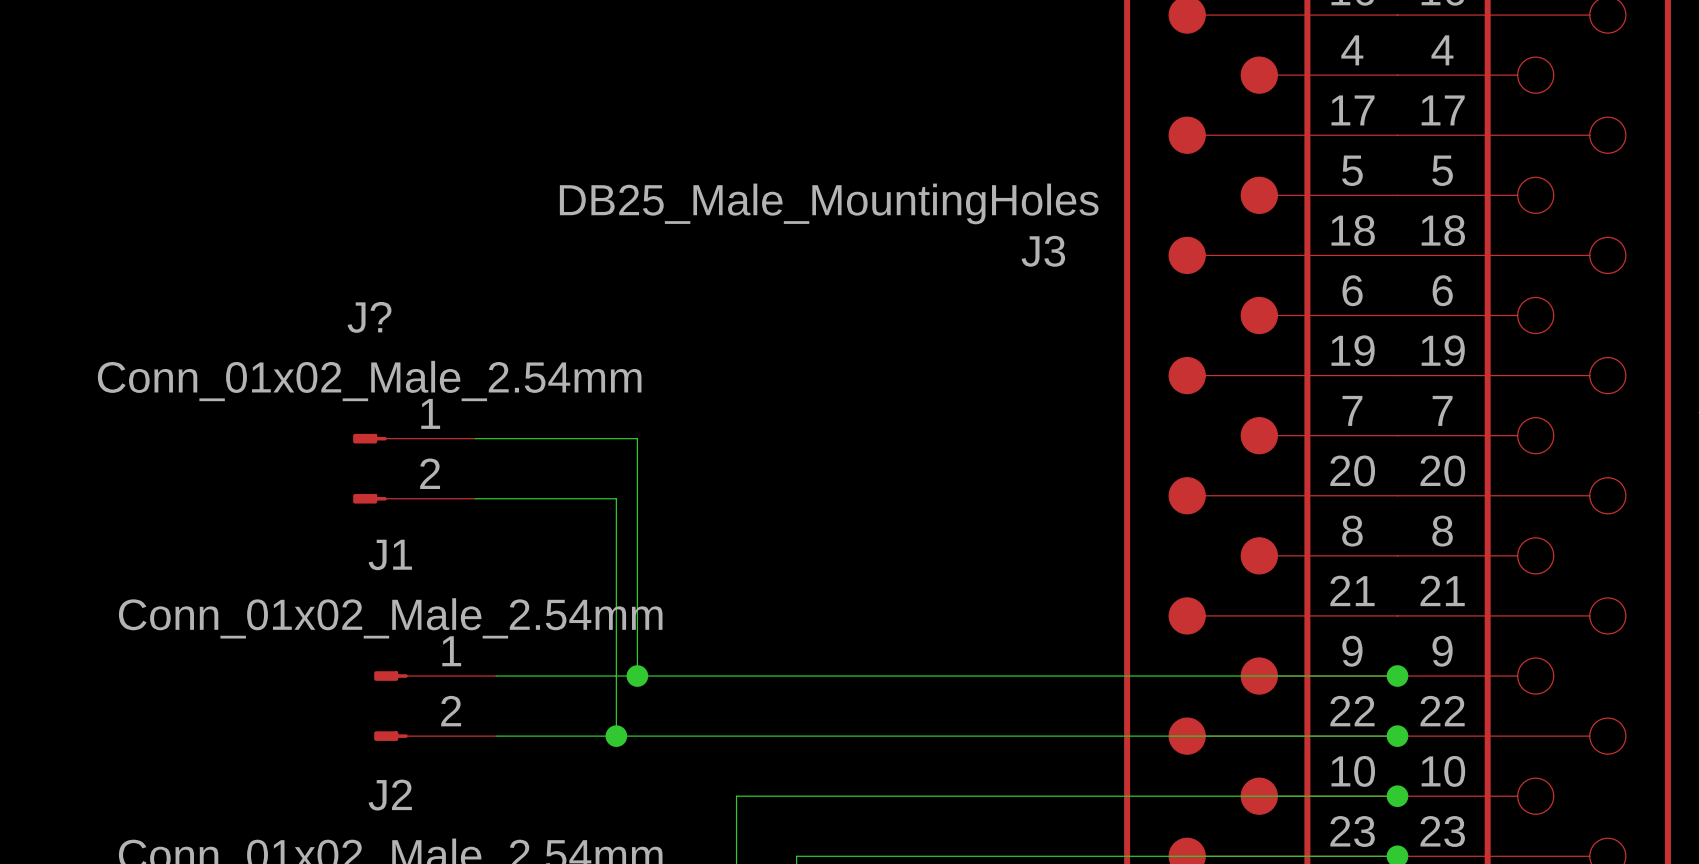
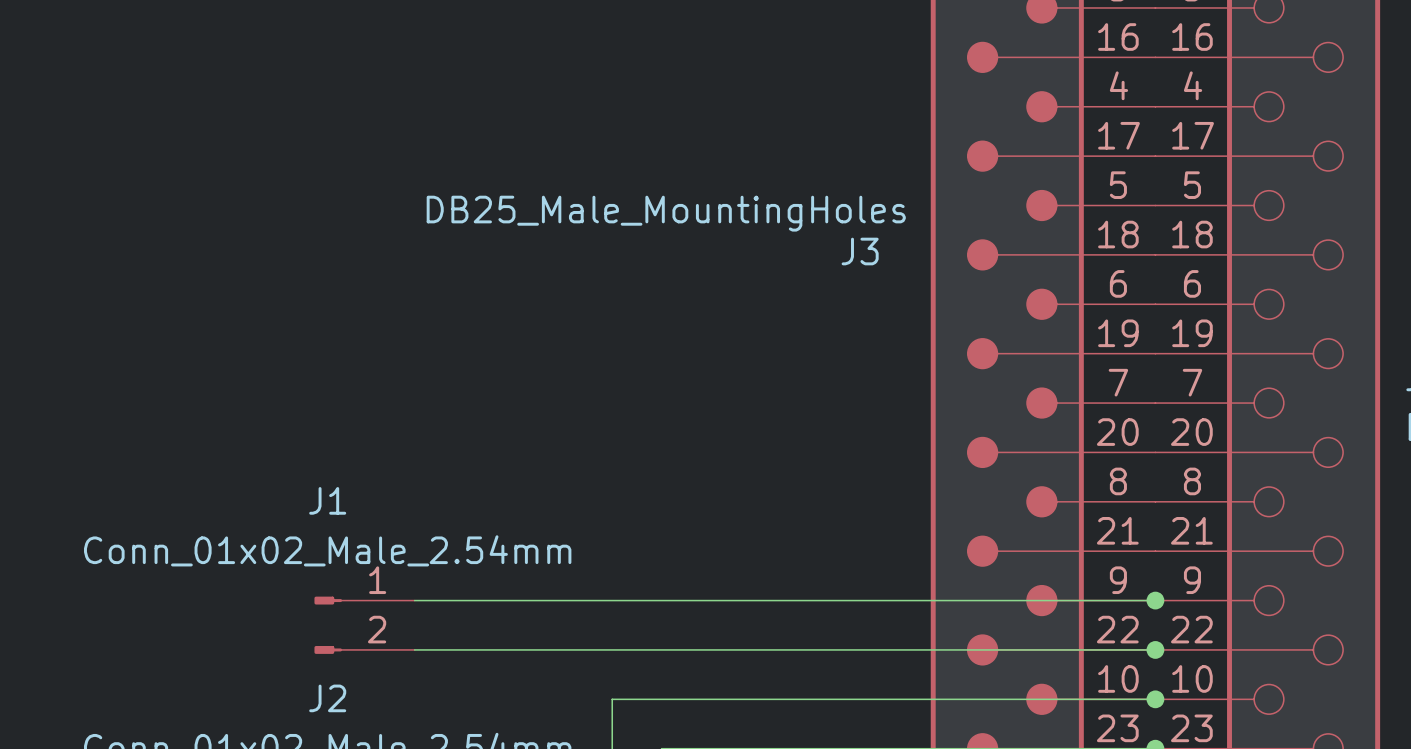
wire: (475, 438) (637, 438) (637, 676) -> none
J?: Conn_01x02_Male_2.54mm (414, 468) -> none
wire: (475, 498) (616, 498) (616, 736) -> none
junction: (637, 676) -> none
junction: (616, 736) -> none

